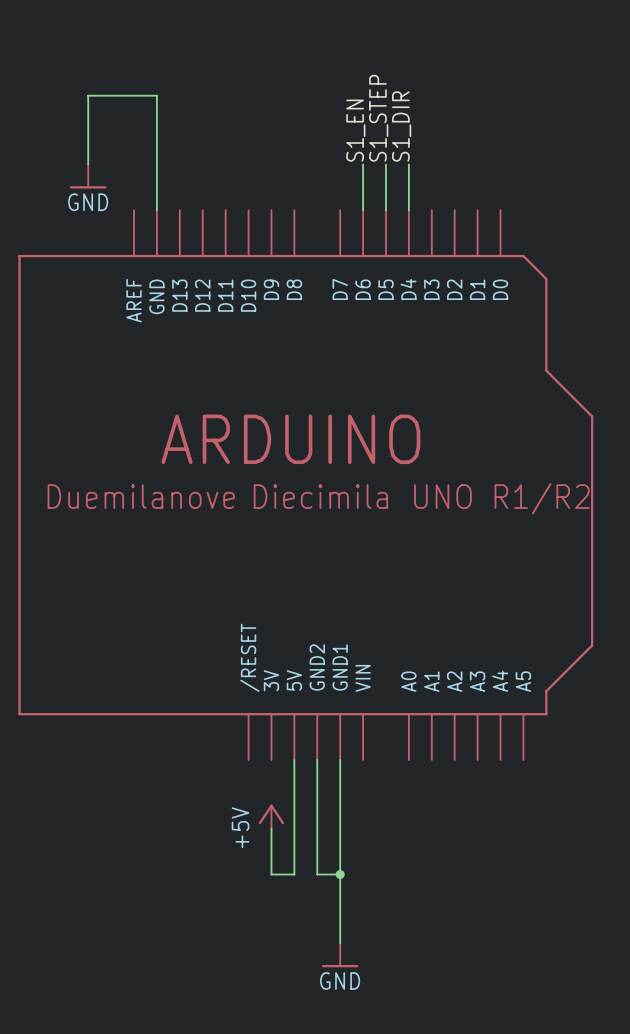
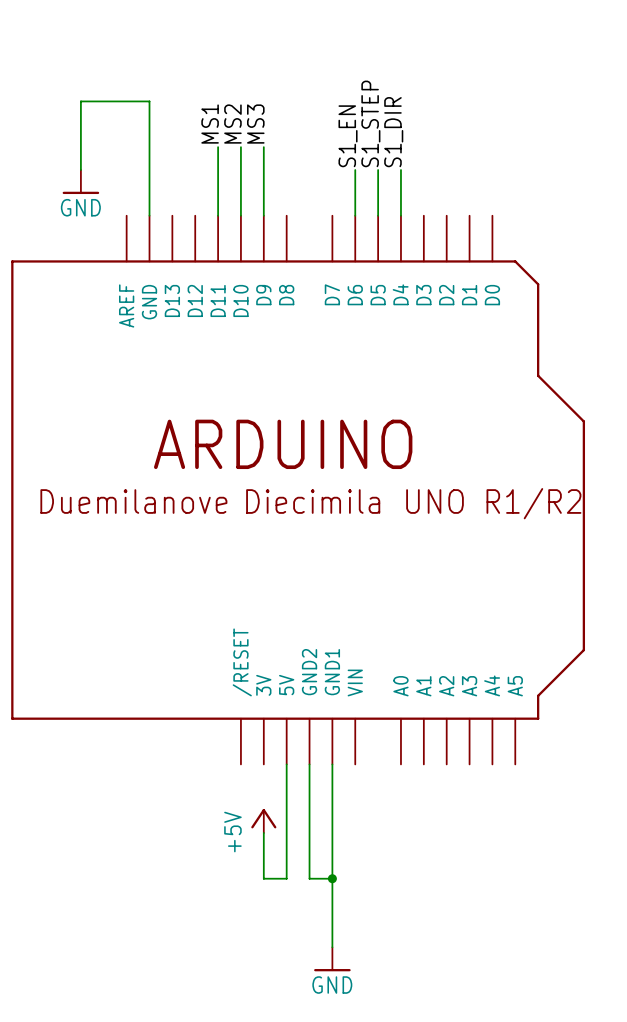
label: none -> MS1 (210, 124)
label: none -> MS2 (232, 124)
label: none -> MS3 (255, 124)
wire: none -> (218, 147) (218, 215)
wire: none -> (240, 147) (240, 215)
wire: none -> (263, 147) (263, 215)

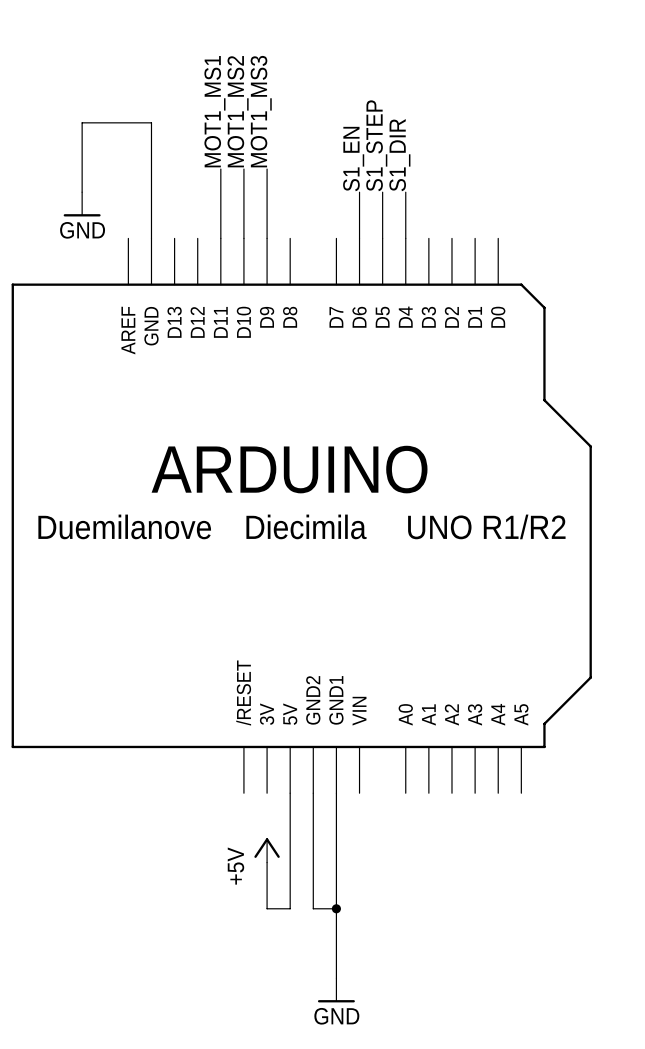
label: MS1 (210, 124) -> MOT1_MS1 (214, 111)
label: MS2 (232, 124) -> MOT1_MS2 (238, 111)
label: MS3 (255, 124) -> MOT1_MS3 (261, 111)

